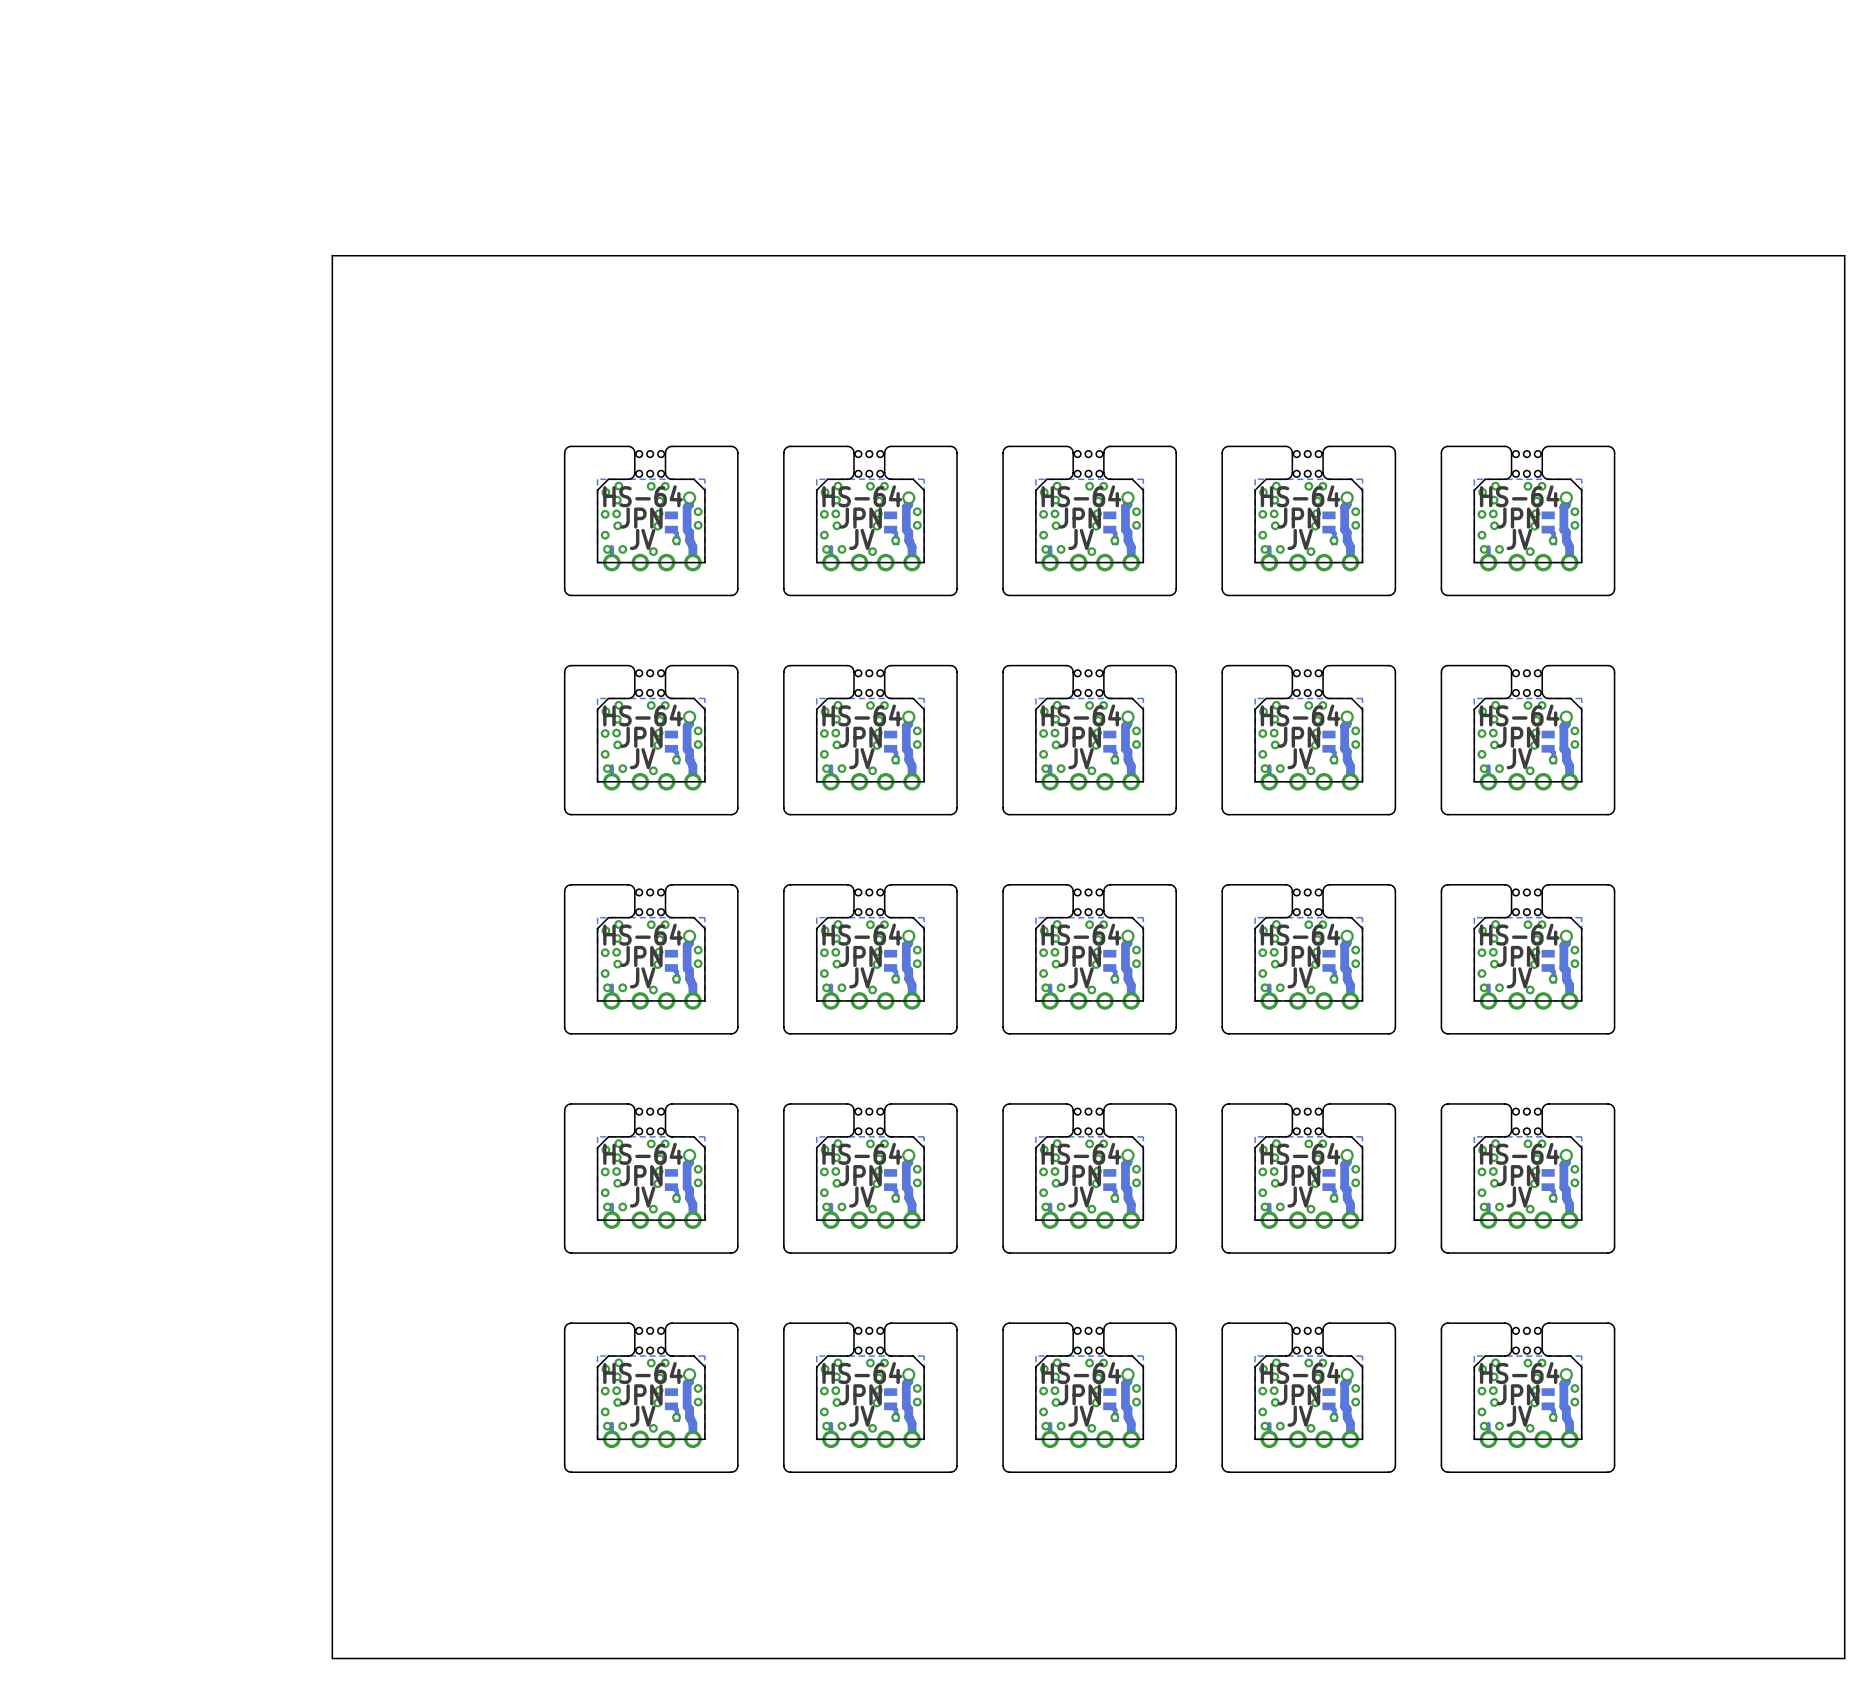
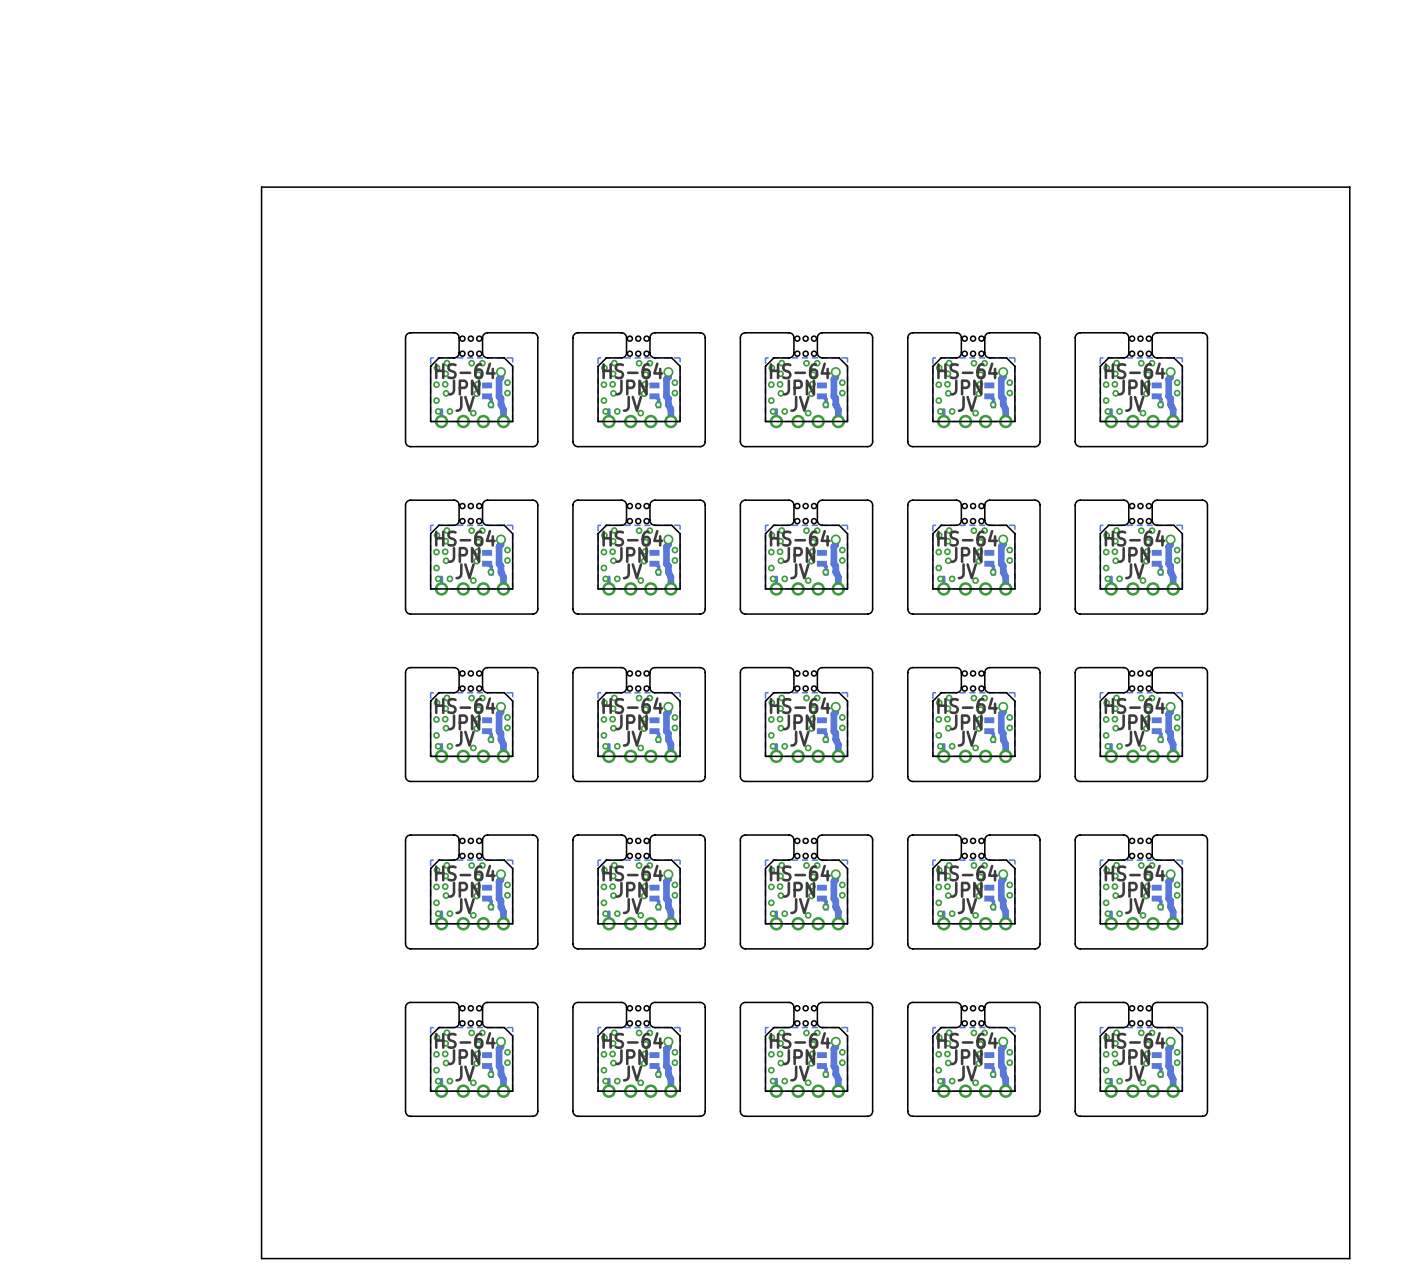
board edge: (376, 255) (332, 255) (332, 1658) (376, 1658) -> (261, 187) (261, 1258)
board edge: (1800, 255) (1844, 255) (1844, 1658) (1800, 1658) -> (1349, 187) (1349, 1258)

